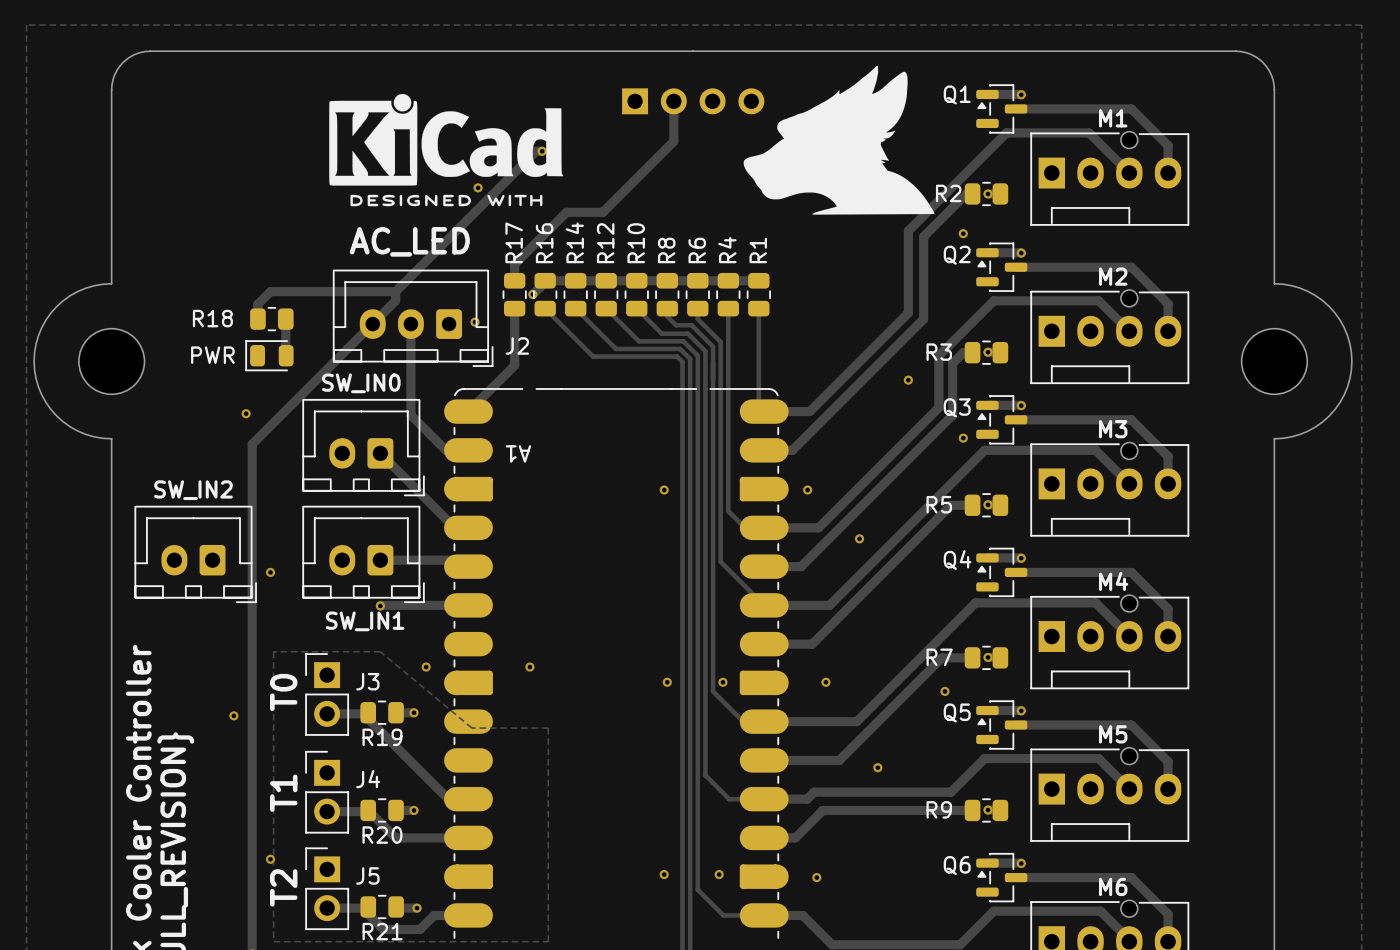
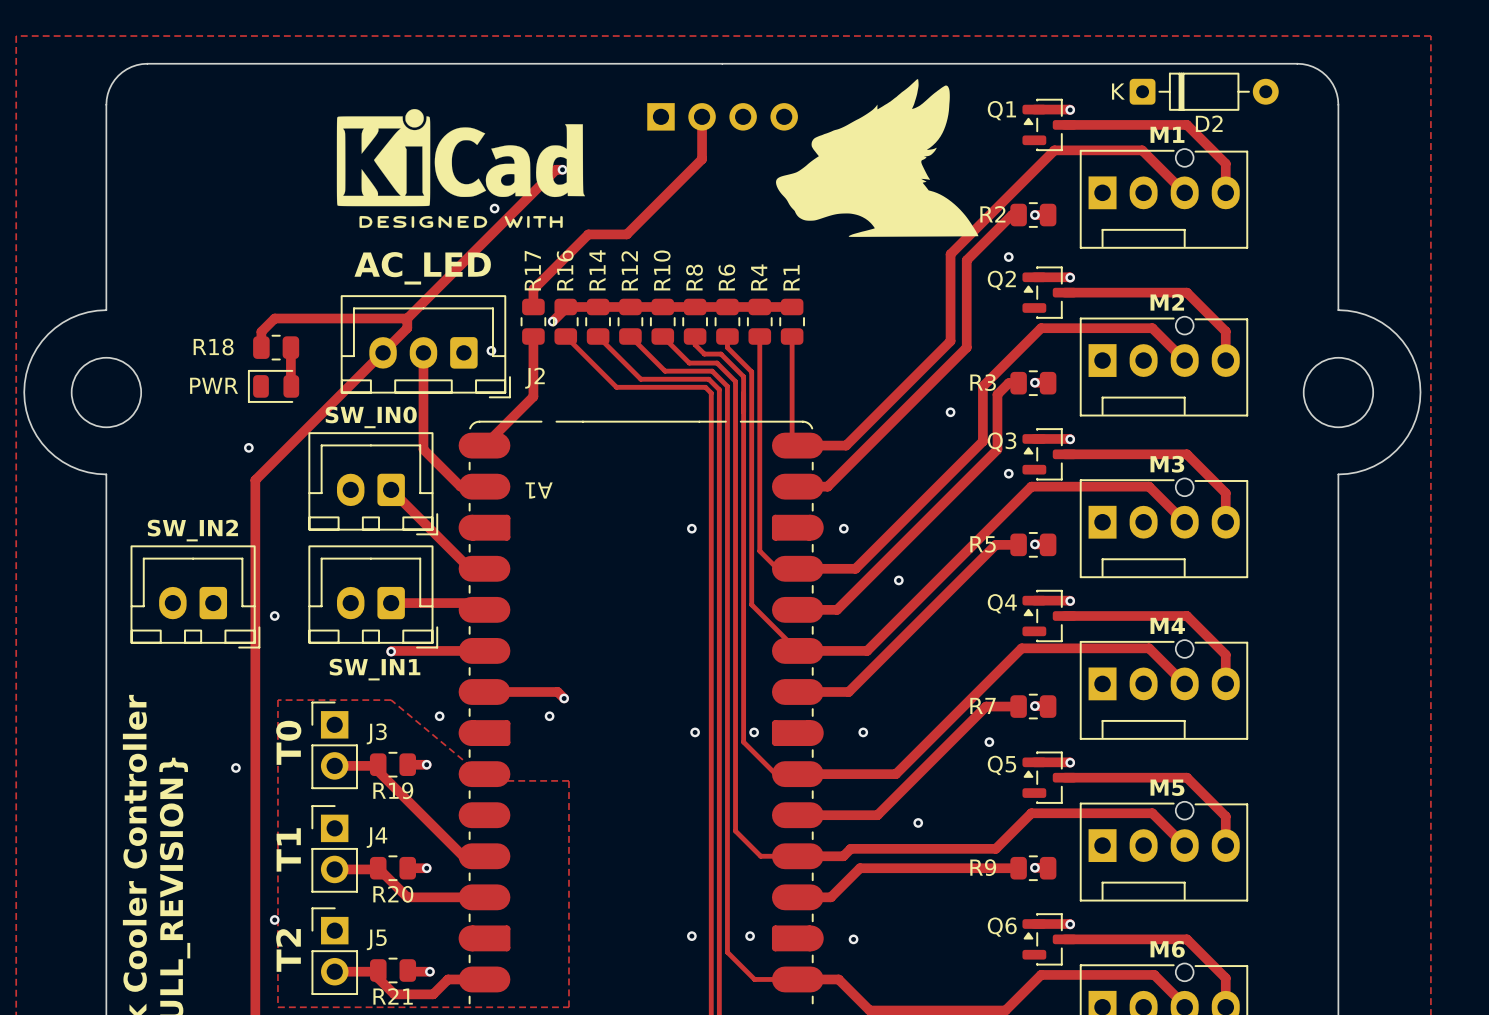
D2: none -> (1204, 91)
track: none -> (484, 691) (557, 691) (564, 698)
via: none -> (564, 698)

